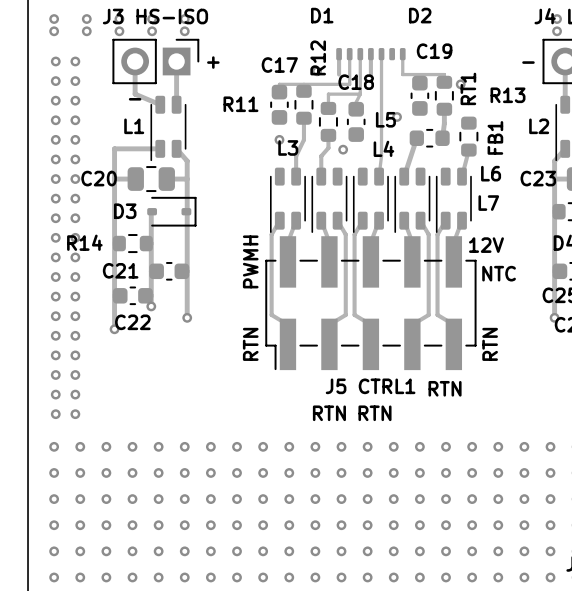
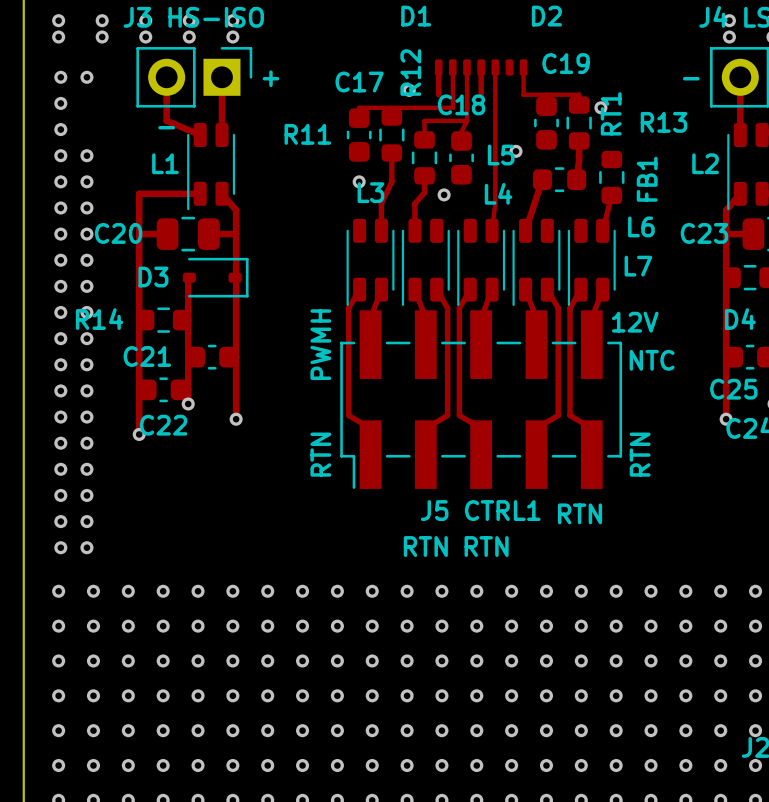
via: (75, 81) -> none
via: (75, 100) -> none

